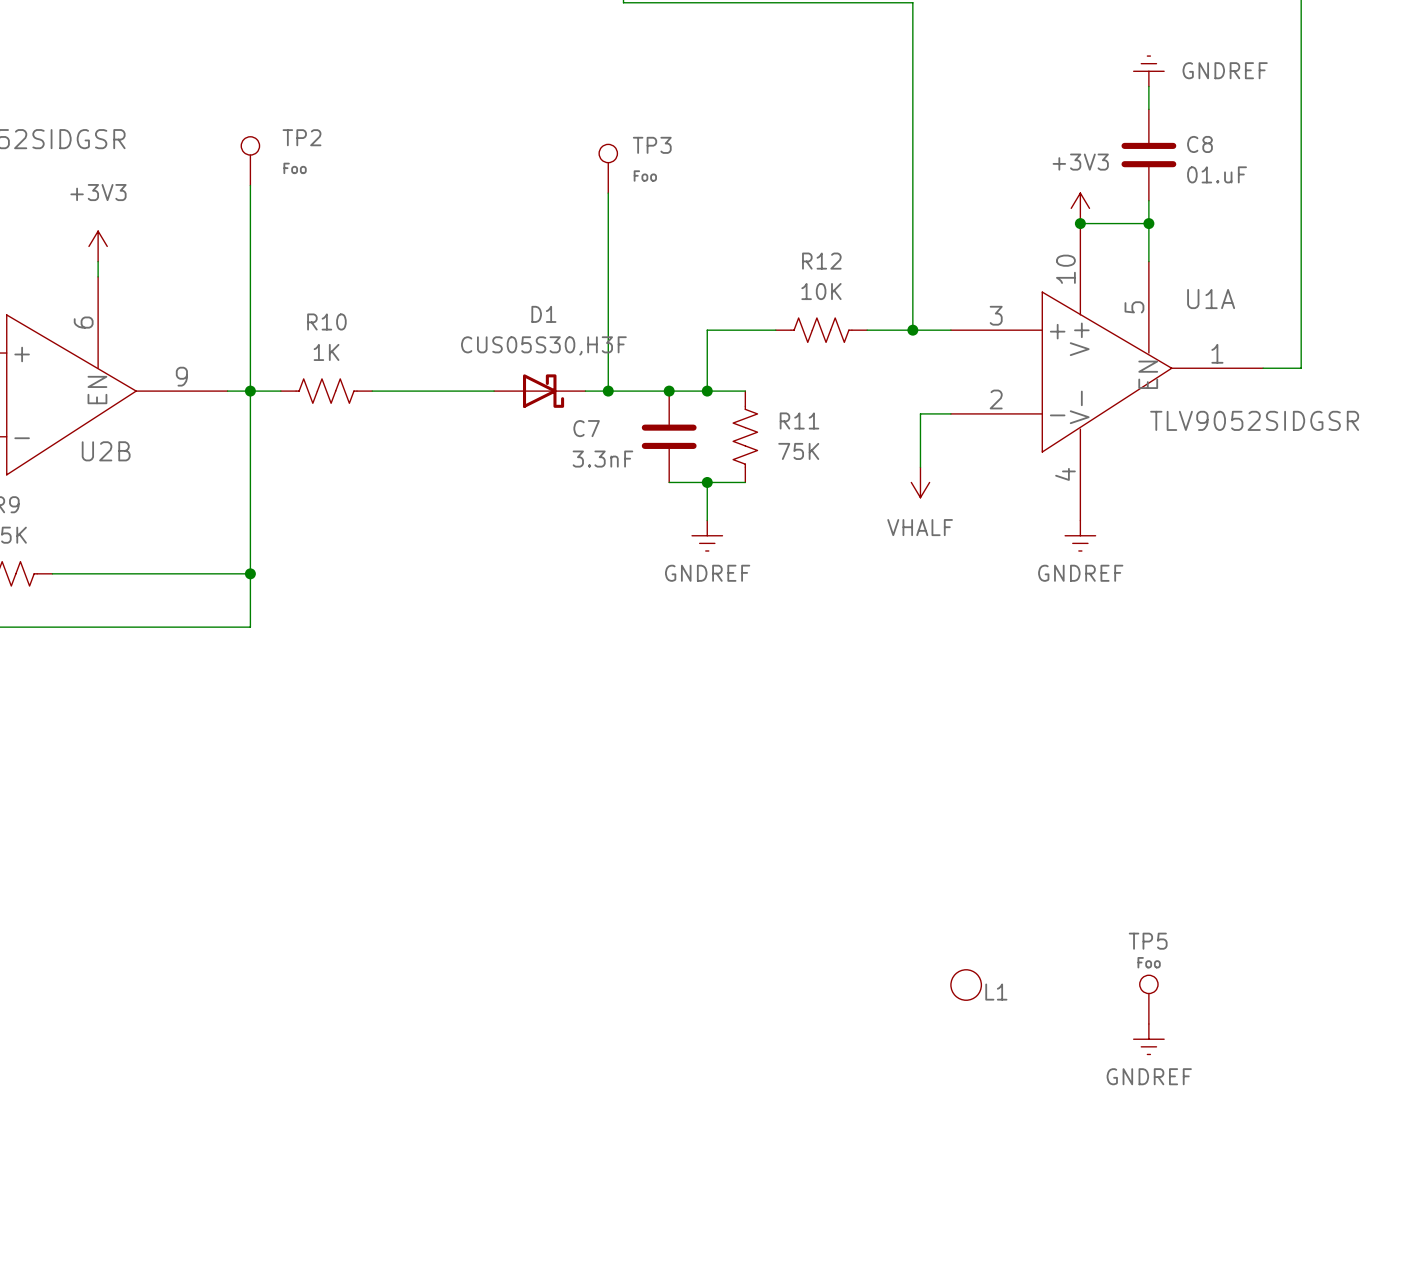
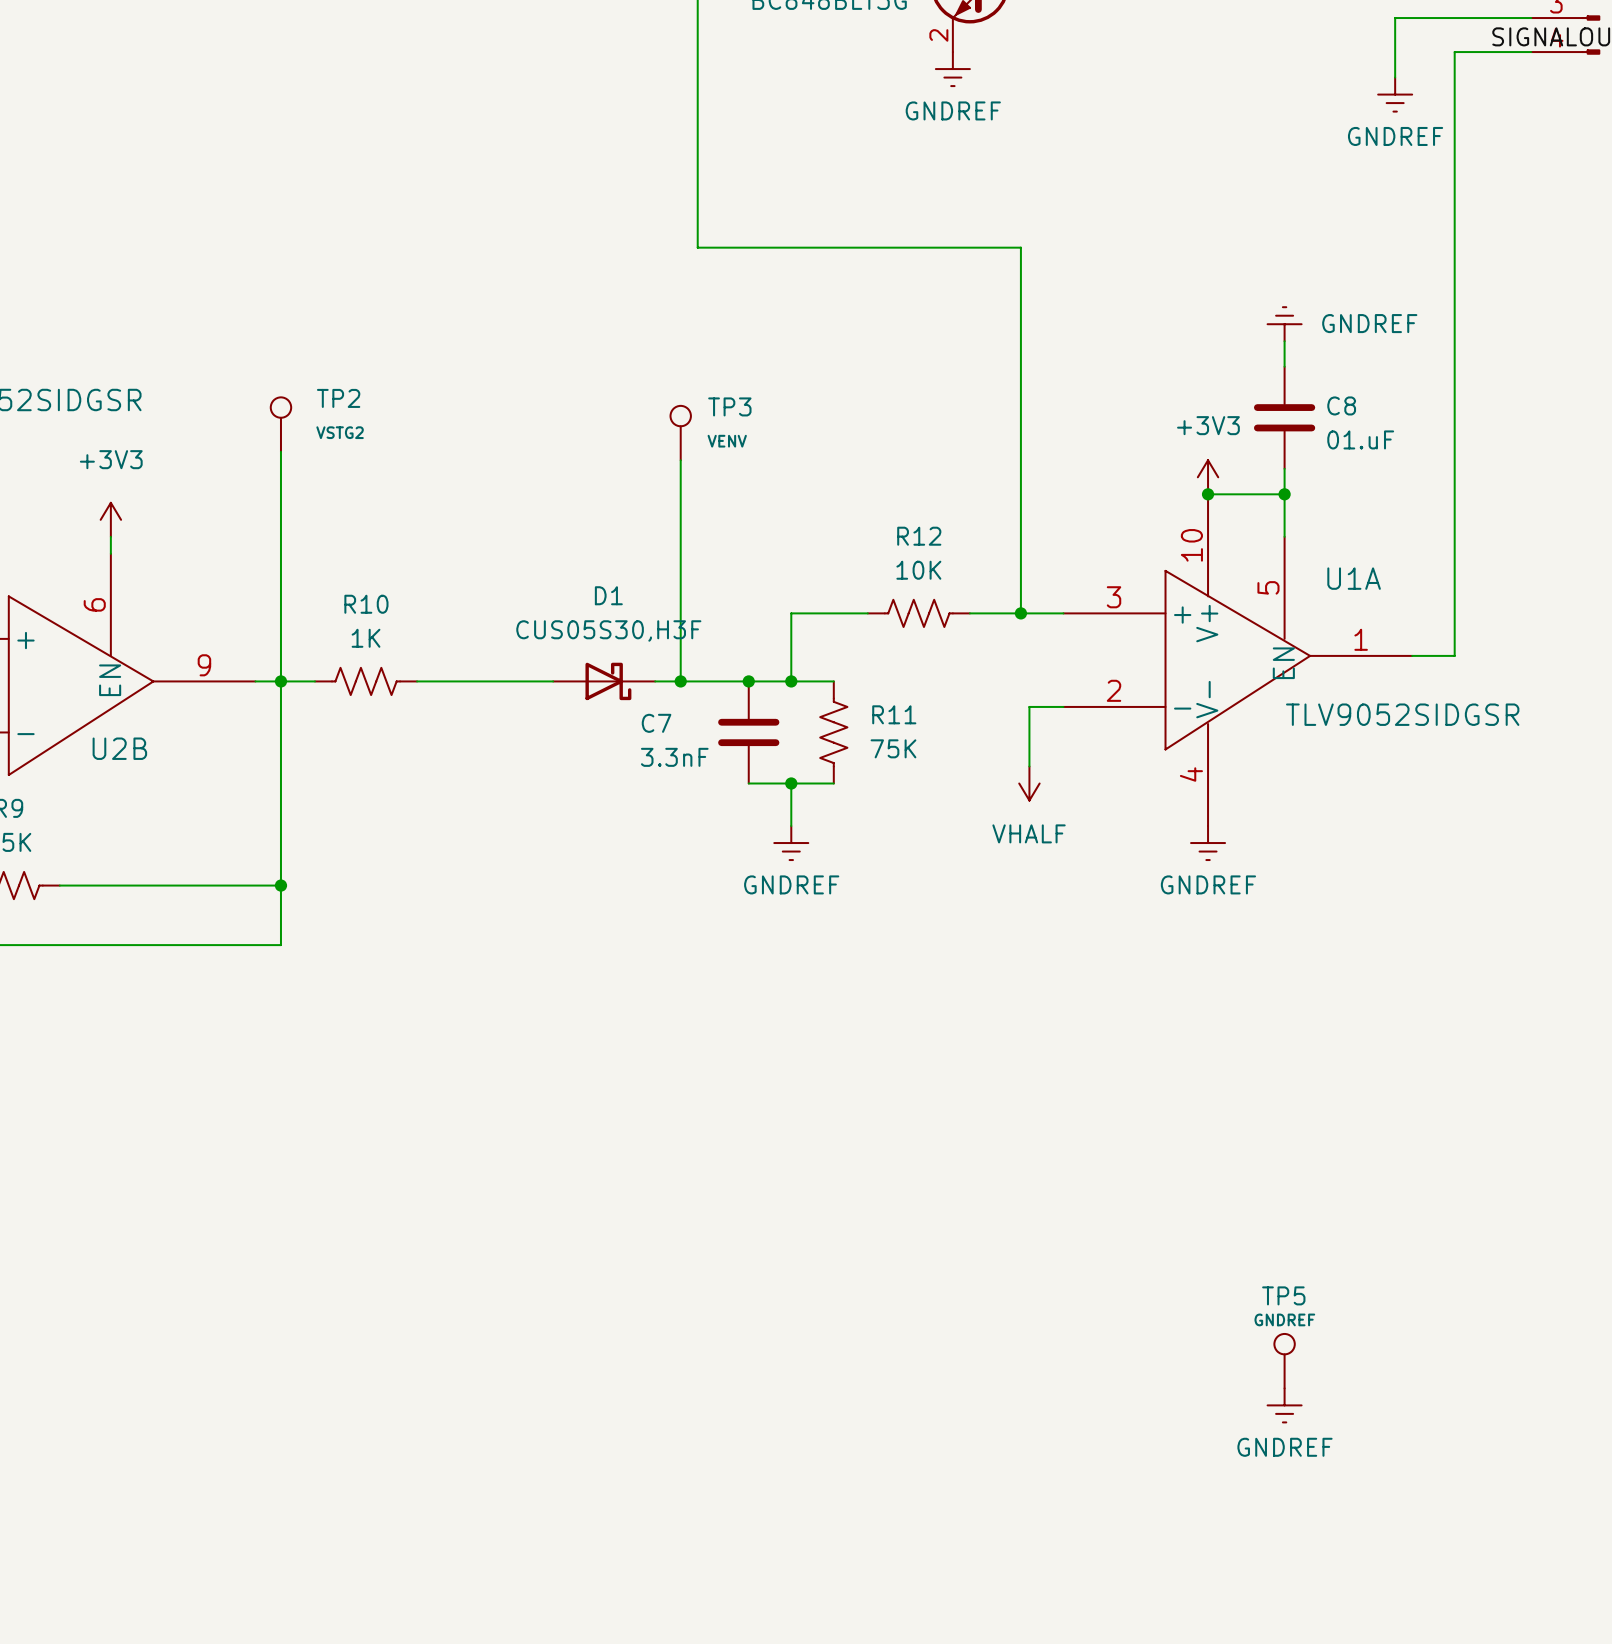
TP2 text: Foo (295, 168) -> VSTG2 (340, 432)
TP3 text: Foo (645, 176) -> VENV (727, 441)
TP5 text: Foo (1149, 962) -> GNDREF (1284, 1319)
L1: (966, 985) -> none

